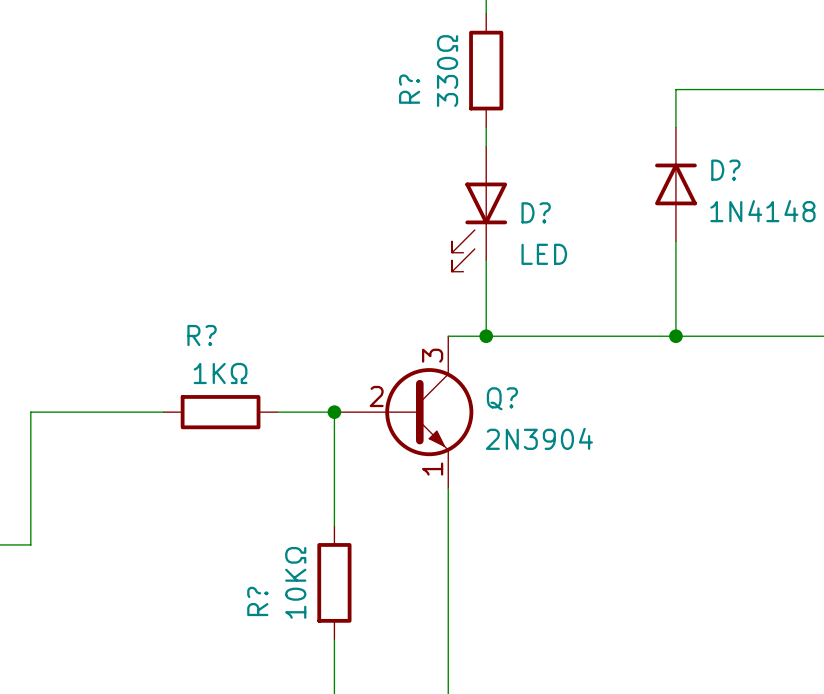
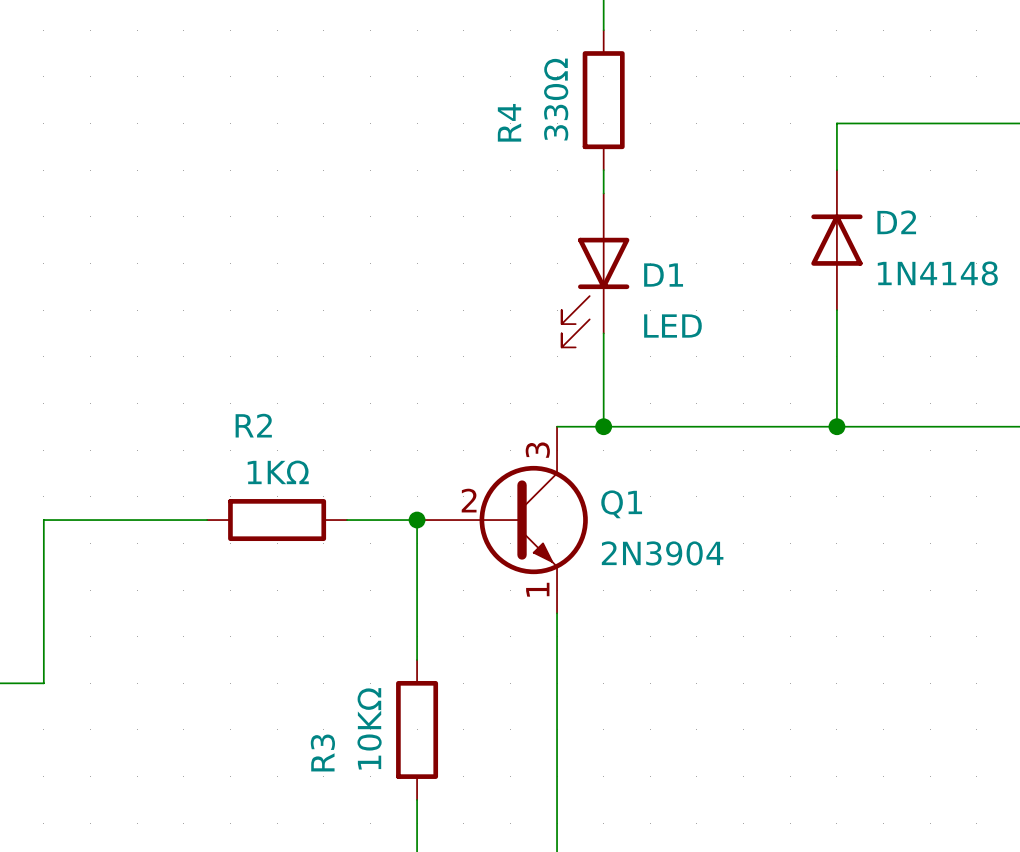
R? name: R? (409, 89) -> R4 (509, 122)
D? name: D? (725, 170) -> D2 (896, 222)
D? name: D? (536, 212) -> D1 (663, 275)
R? name: R? (202, 335) -> R2 (253, 425)
Q? name: Q? (502, 398) -> Q1 (621, 504)
R? name: R? (257, 601) -> R3 (322, 753)

